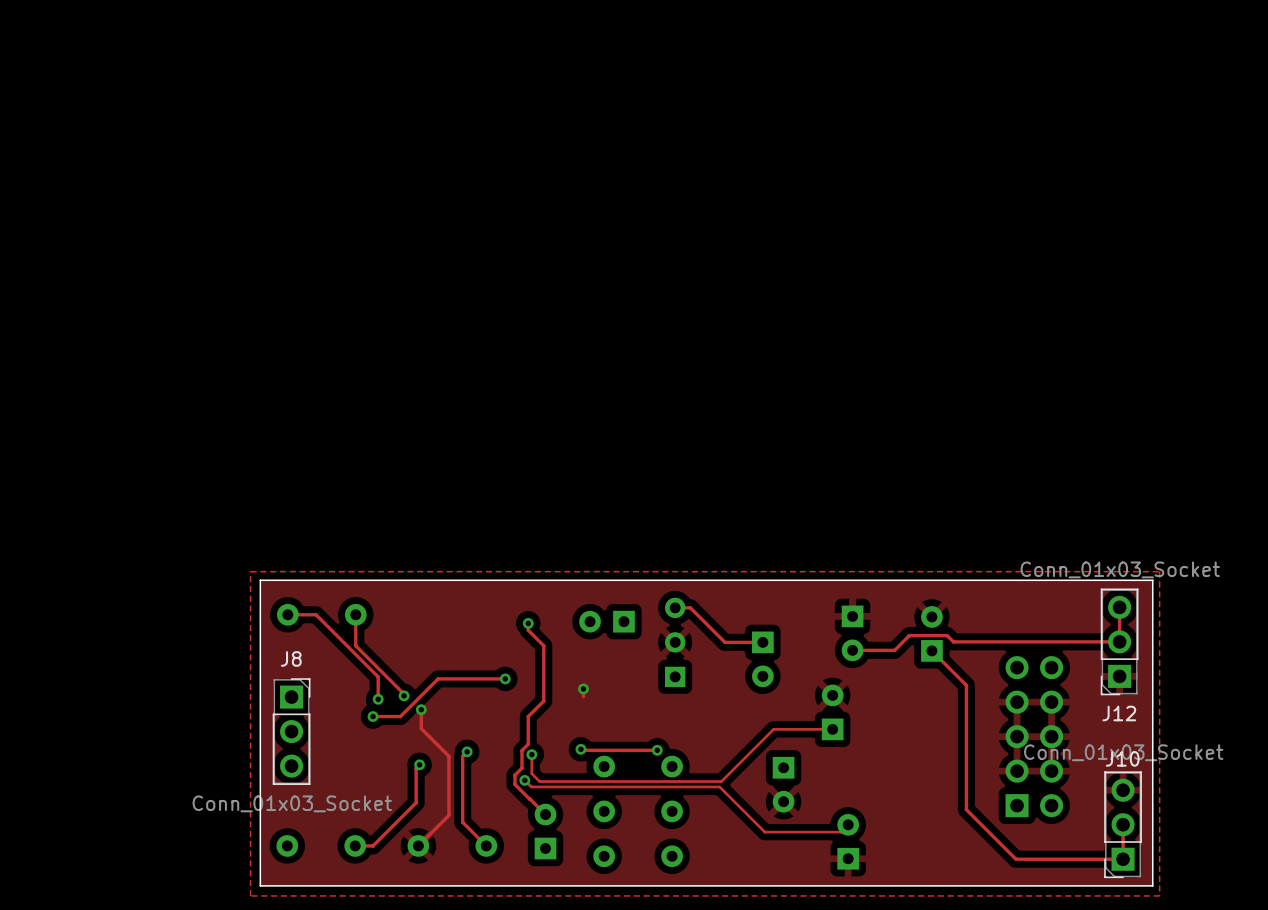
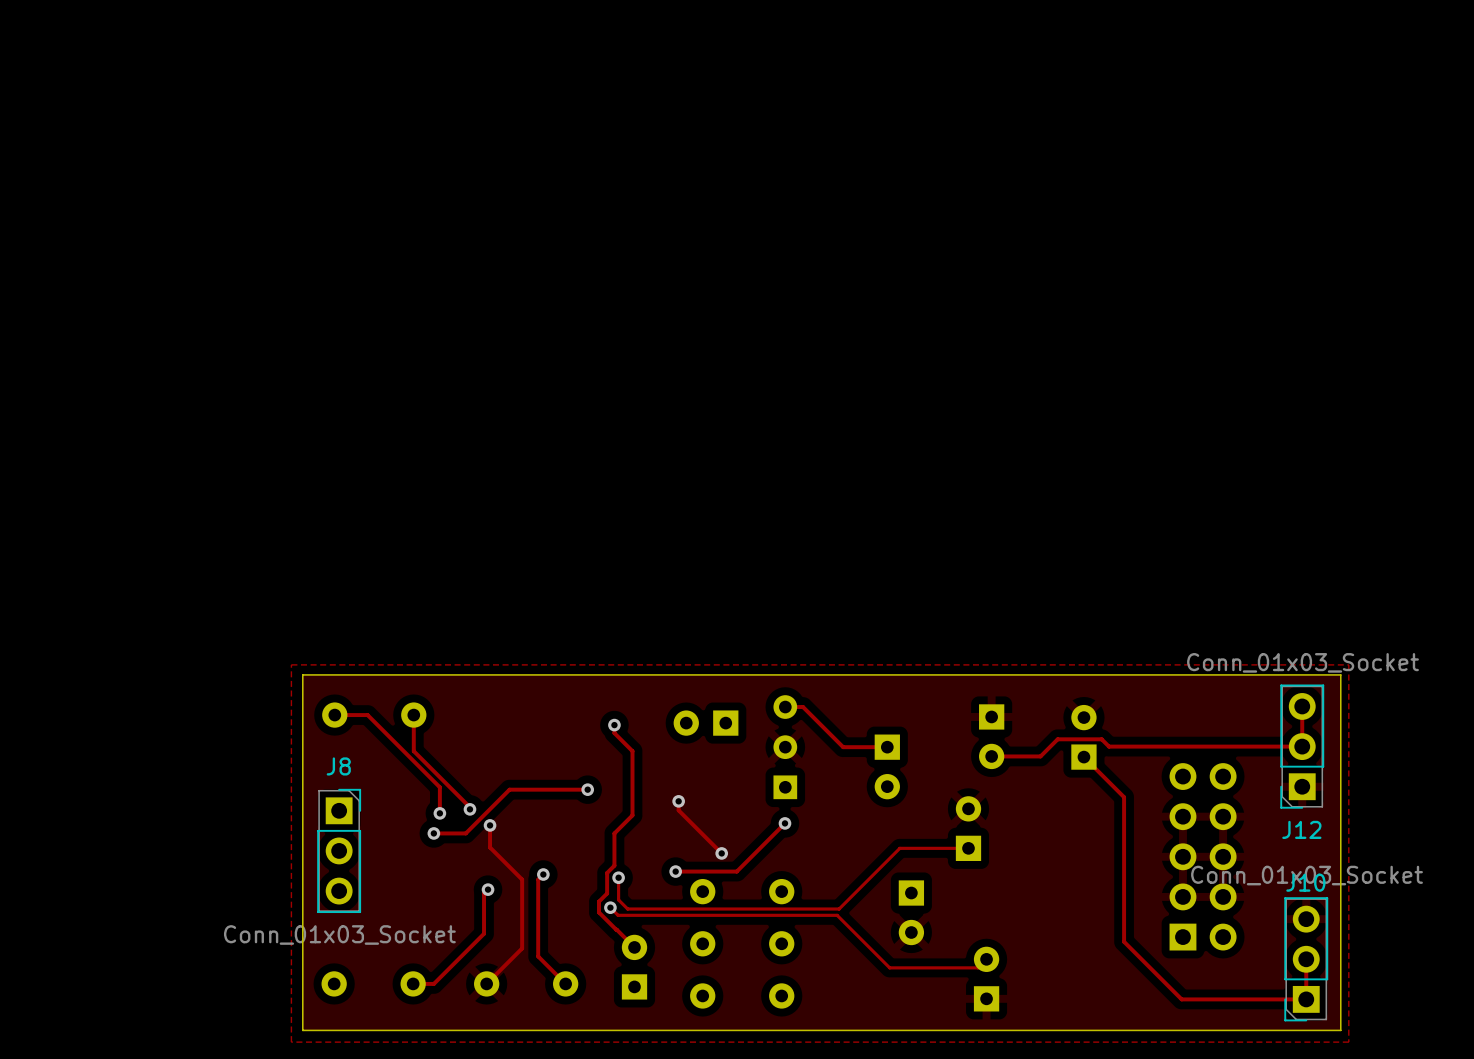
track: none -> (678, 810) (721, 853)
via: none -> (784, 823)
via: none -> (721, 853)
track: (580, 749) (657, 750) -> (675, 871) (736, 871) (784, 823)
via: (657, 750) -> none

